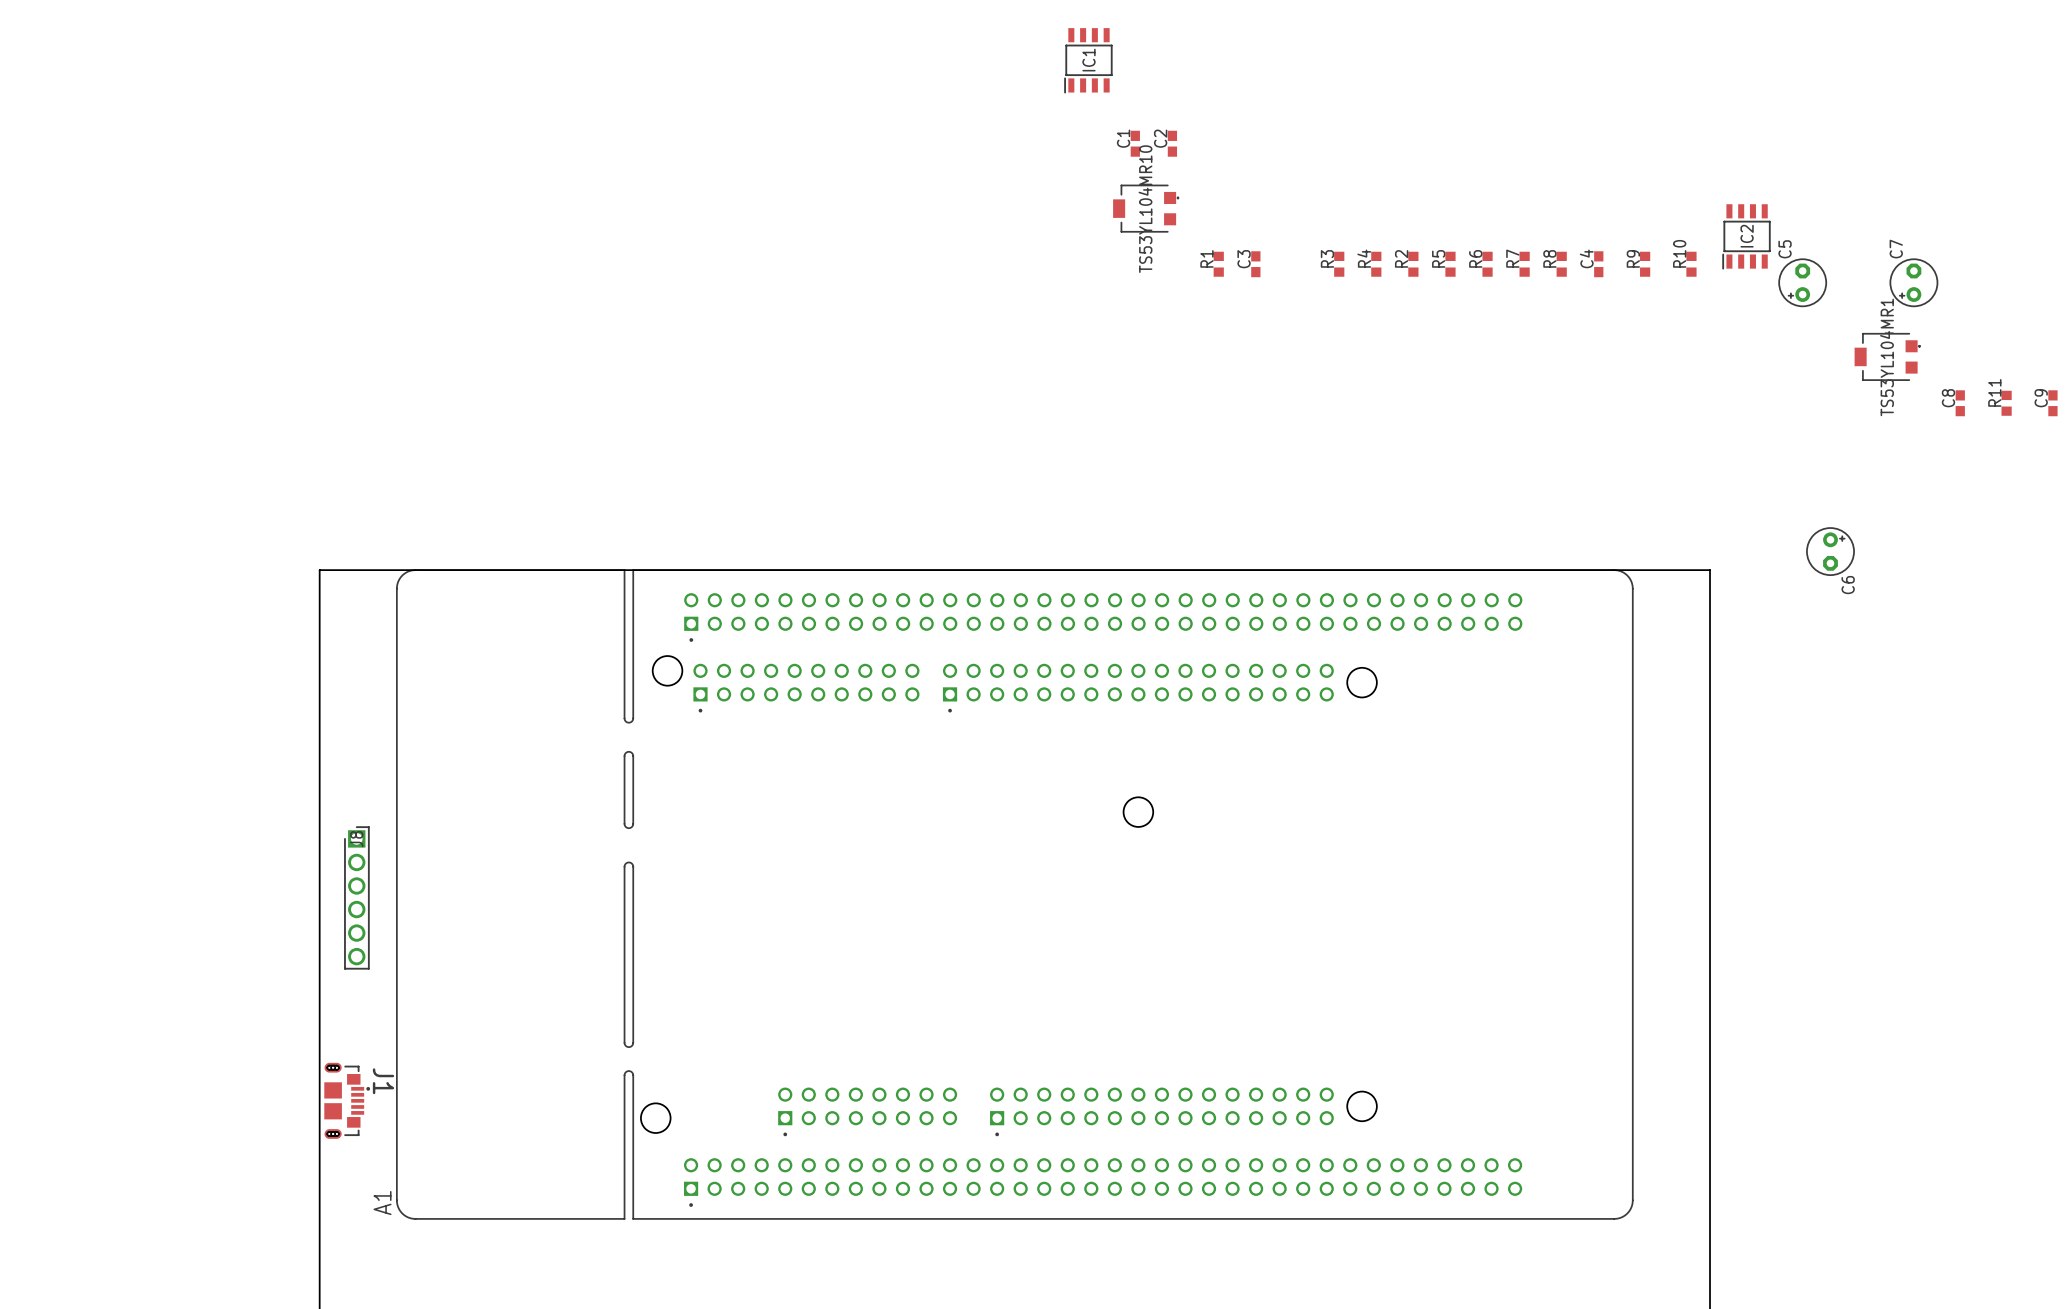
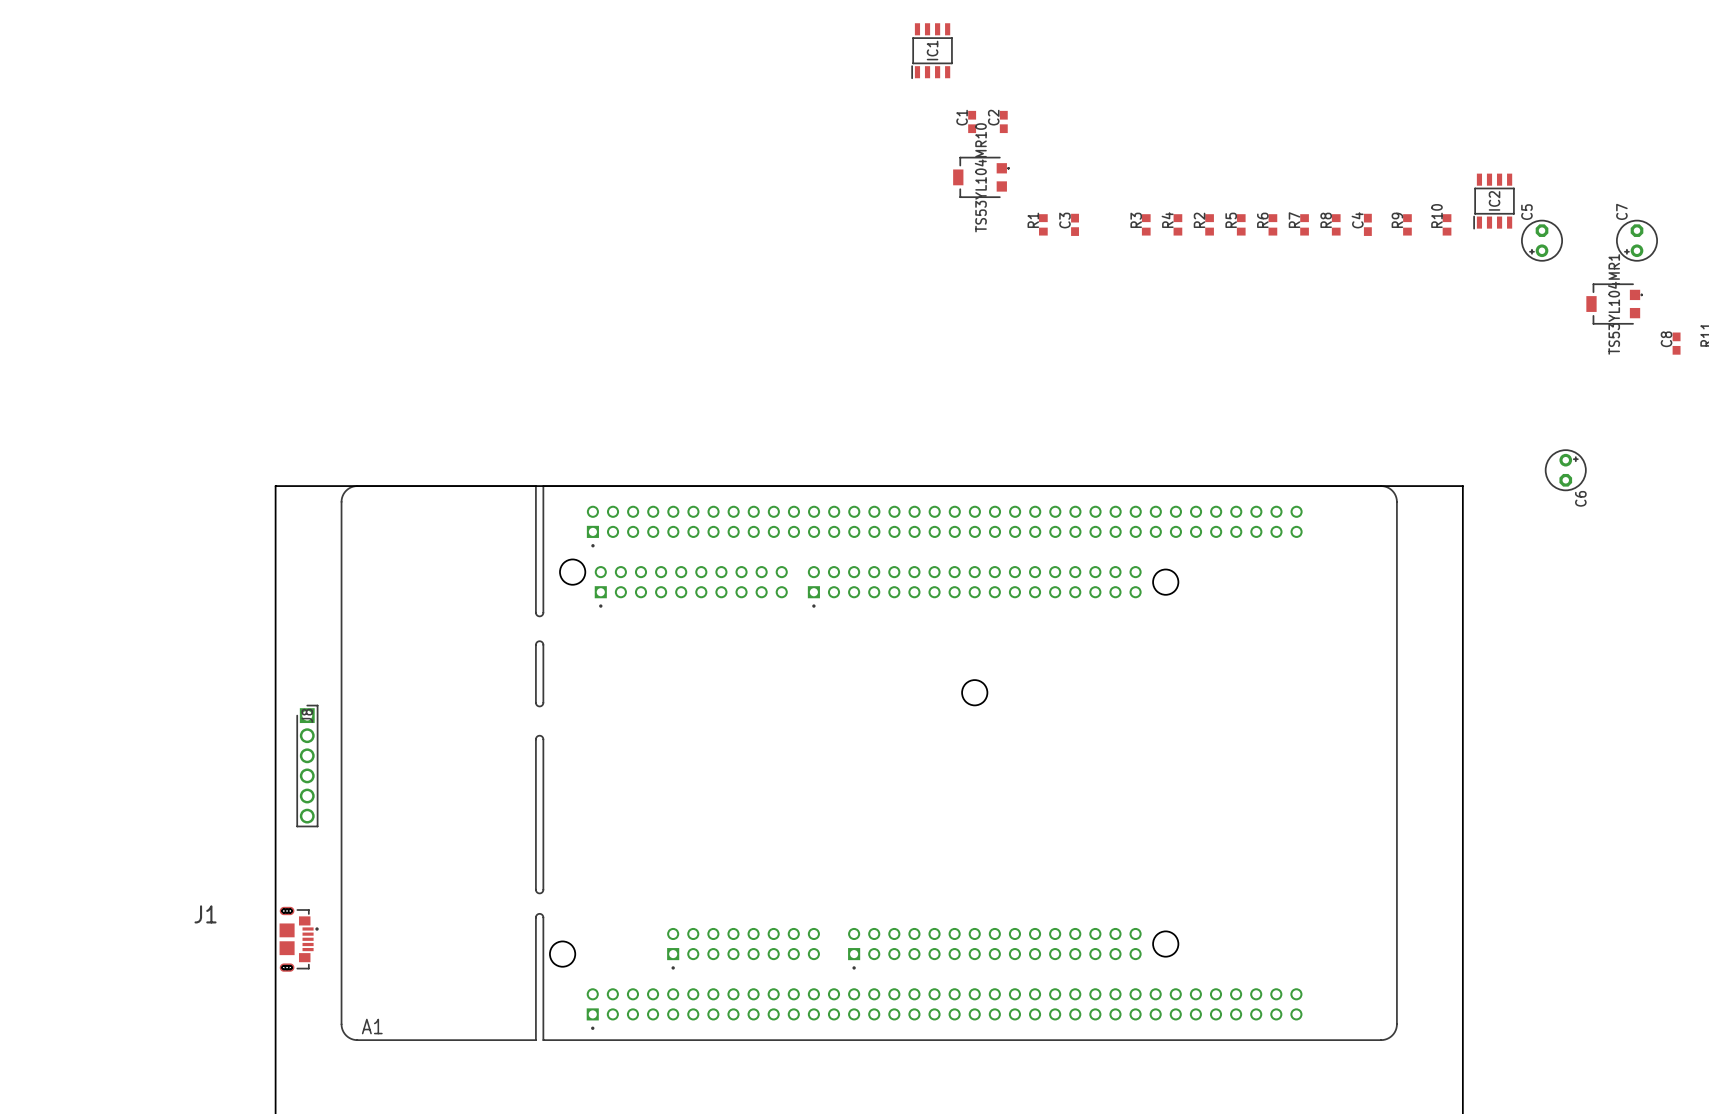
J1 name rotation: 0° (383, 1081) -> 90° counterclockwise (205, 914)
J1 name position: J1 (383, 1081) -> J1 (205, 914)
A1 name rotation: 0° (382, 1203) -> 90° clockwise (372, 1026)
A1 name position: A1 (382, 1203) -> A1 (372, 1026)

